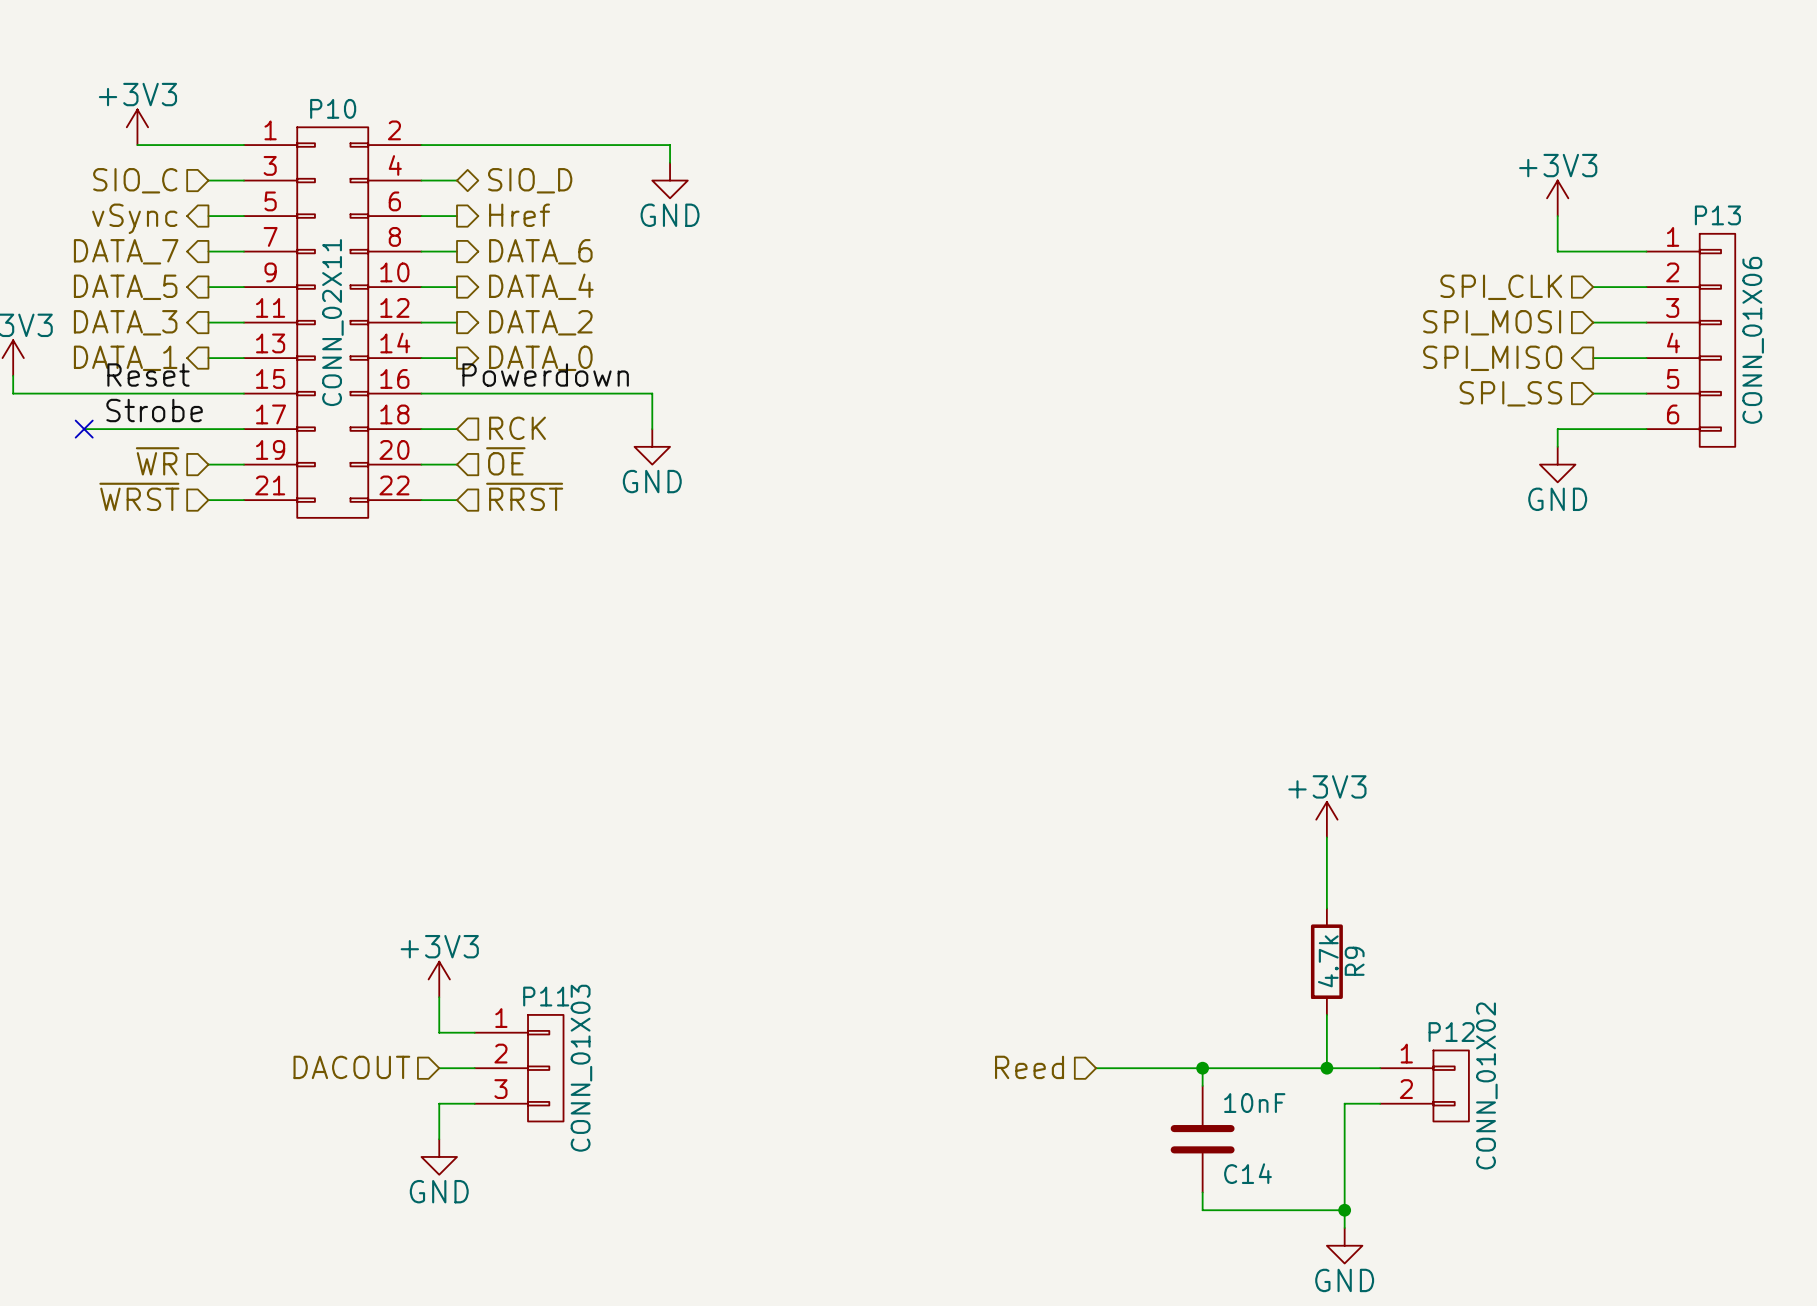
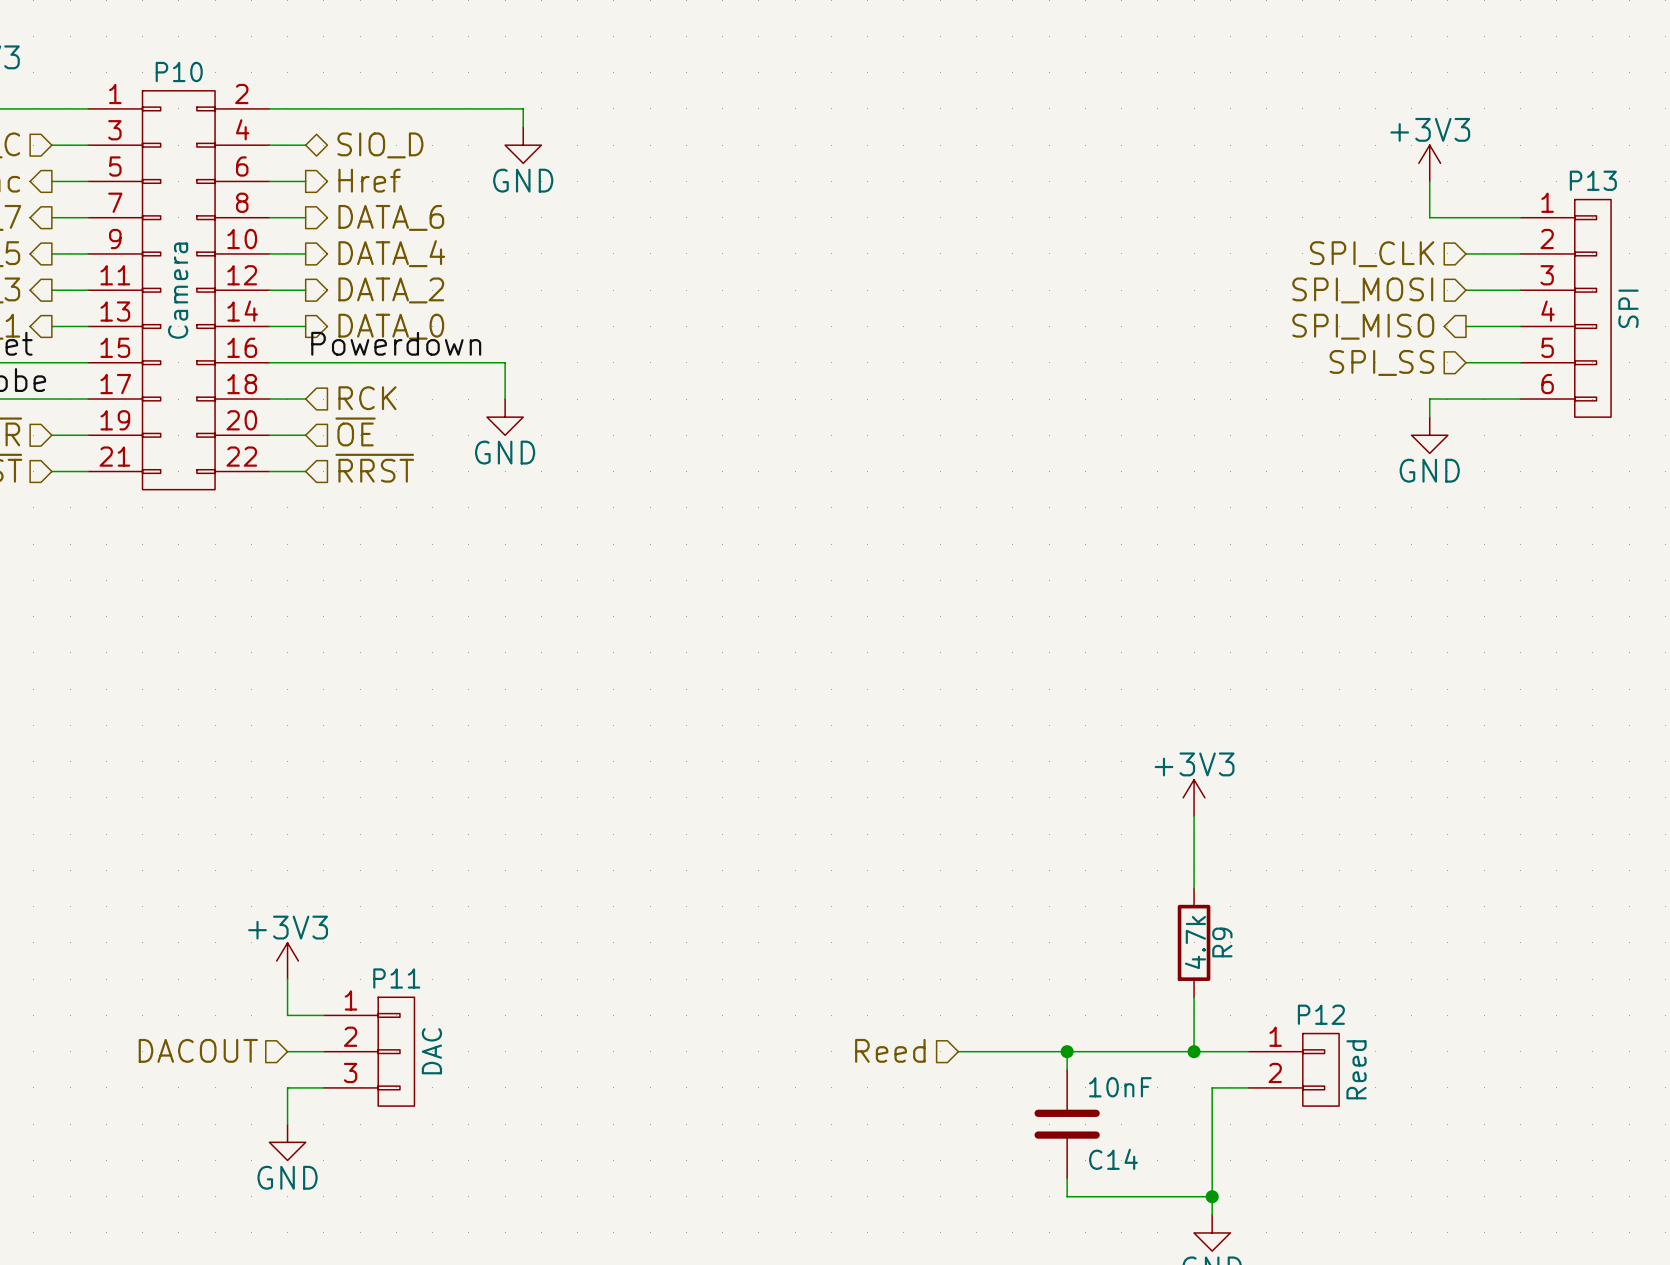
P10 value: CONN_02X11 (332, 322) -> Camera (178, 290)
P13 value: CONN_01X06 (1753, 340) -> SPI (1628, 308)
P11 value: CONN_01X03 (581, 1068) -> DAC (431, 1051)
P12 value: CONN_01X02 (1486, 1085) -> Reed (1356, 1069)

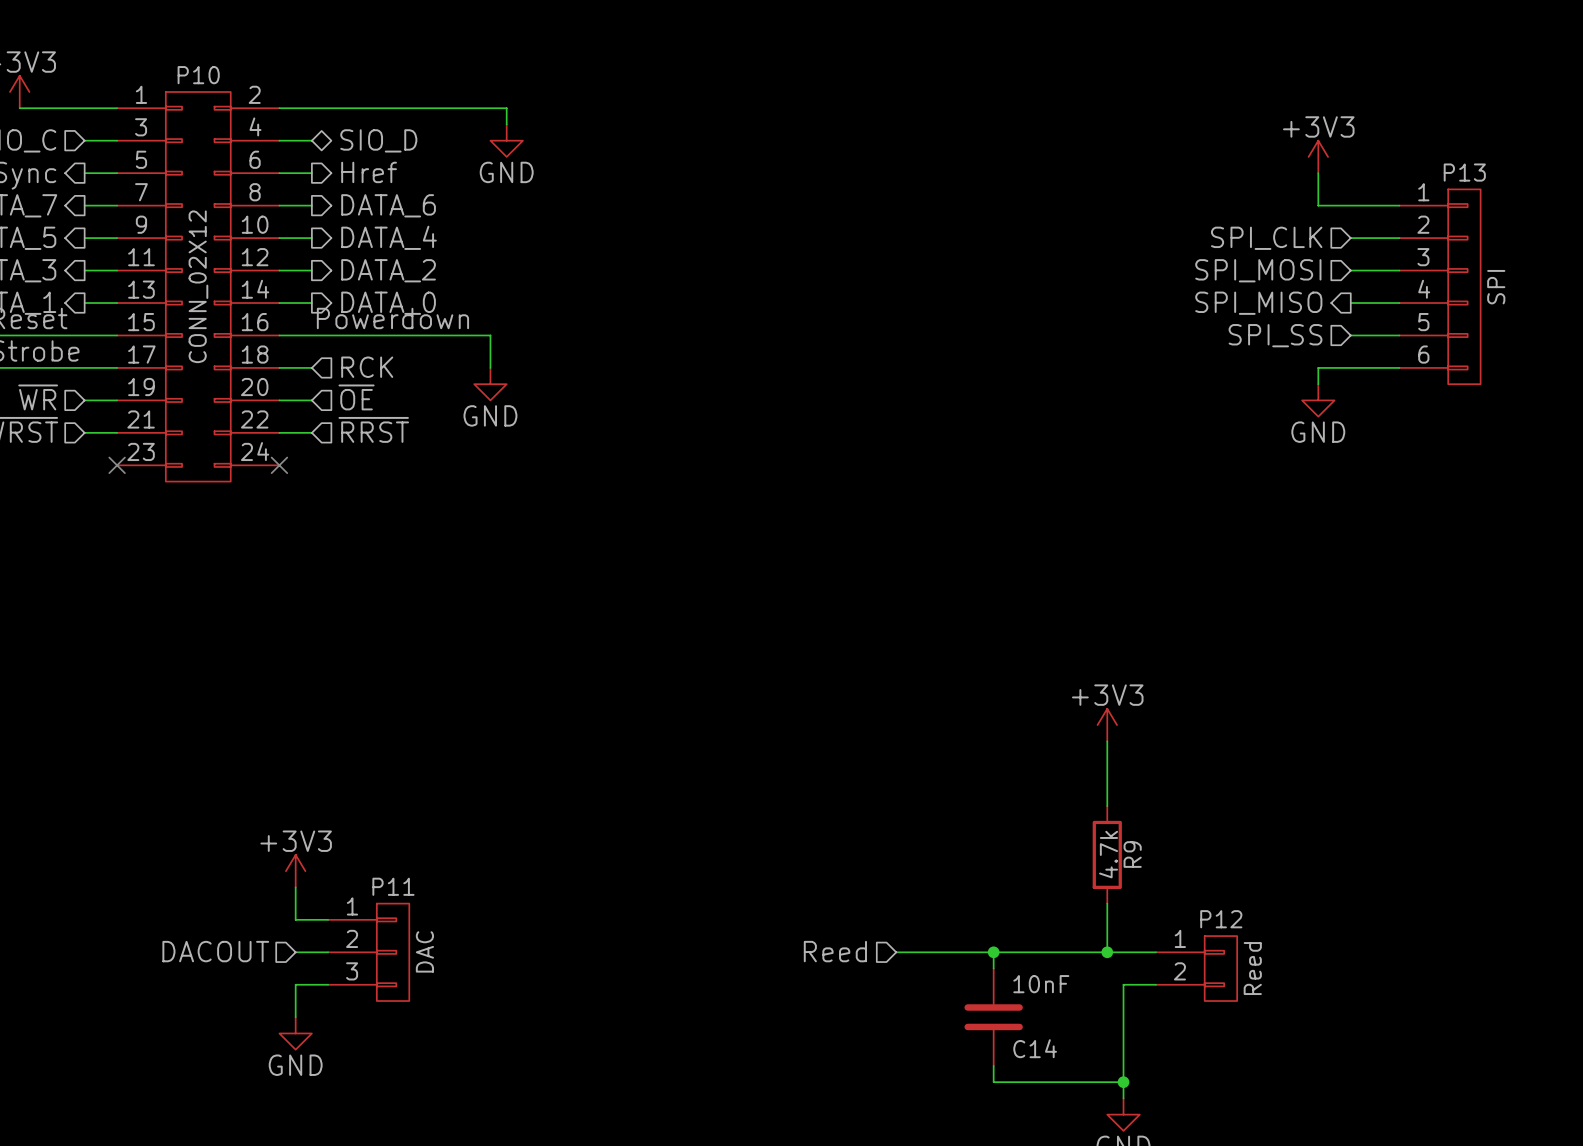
P10 symbol: [88, 90, 270, 490] -> [117, 91, 280, 482]
P10 value: Camera (178, 290) -> CONN_02X12 (198, 286)
no-connect mark: none -> (117, 465)
no-connect mark: none -> (279, 465)

